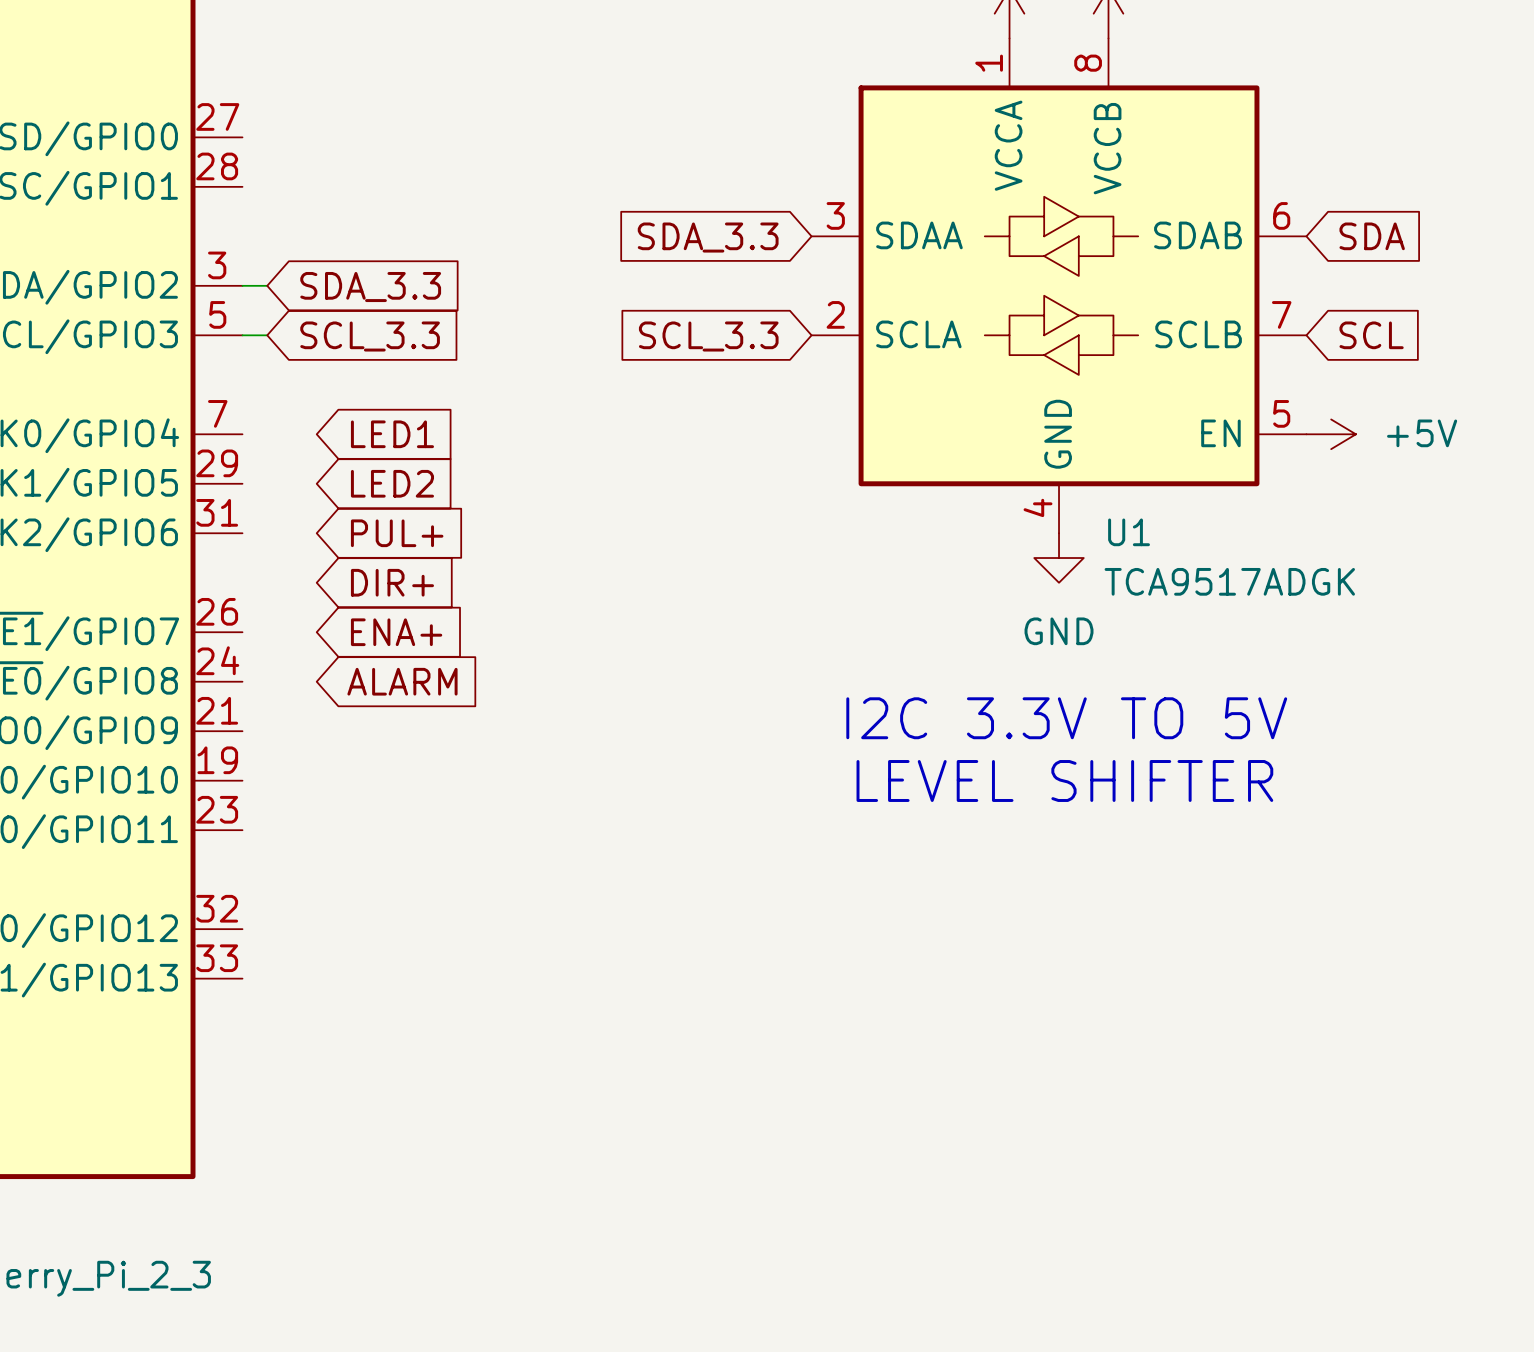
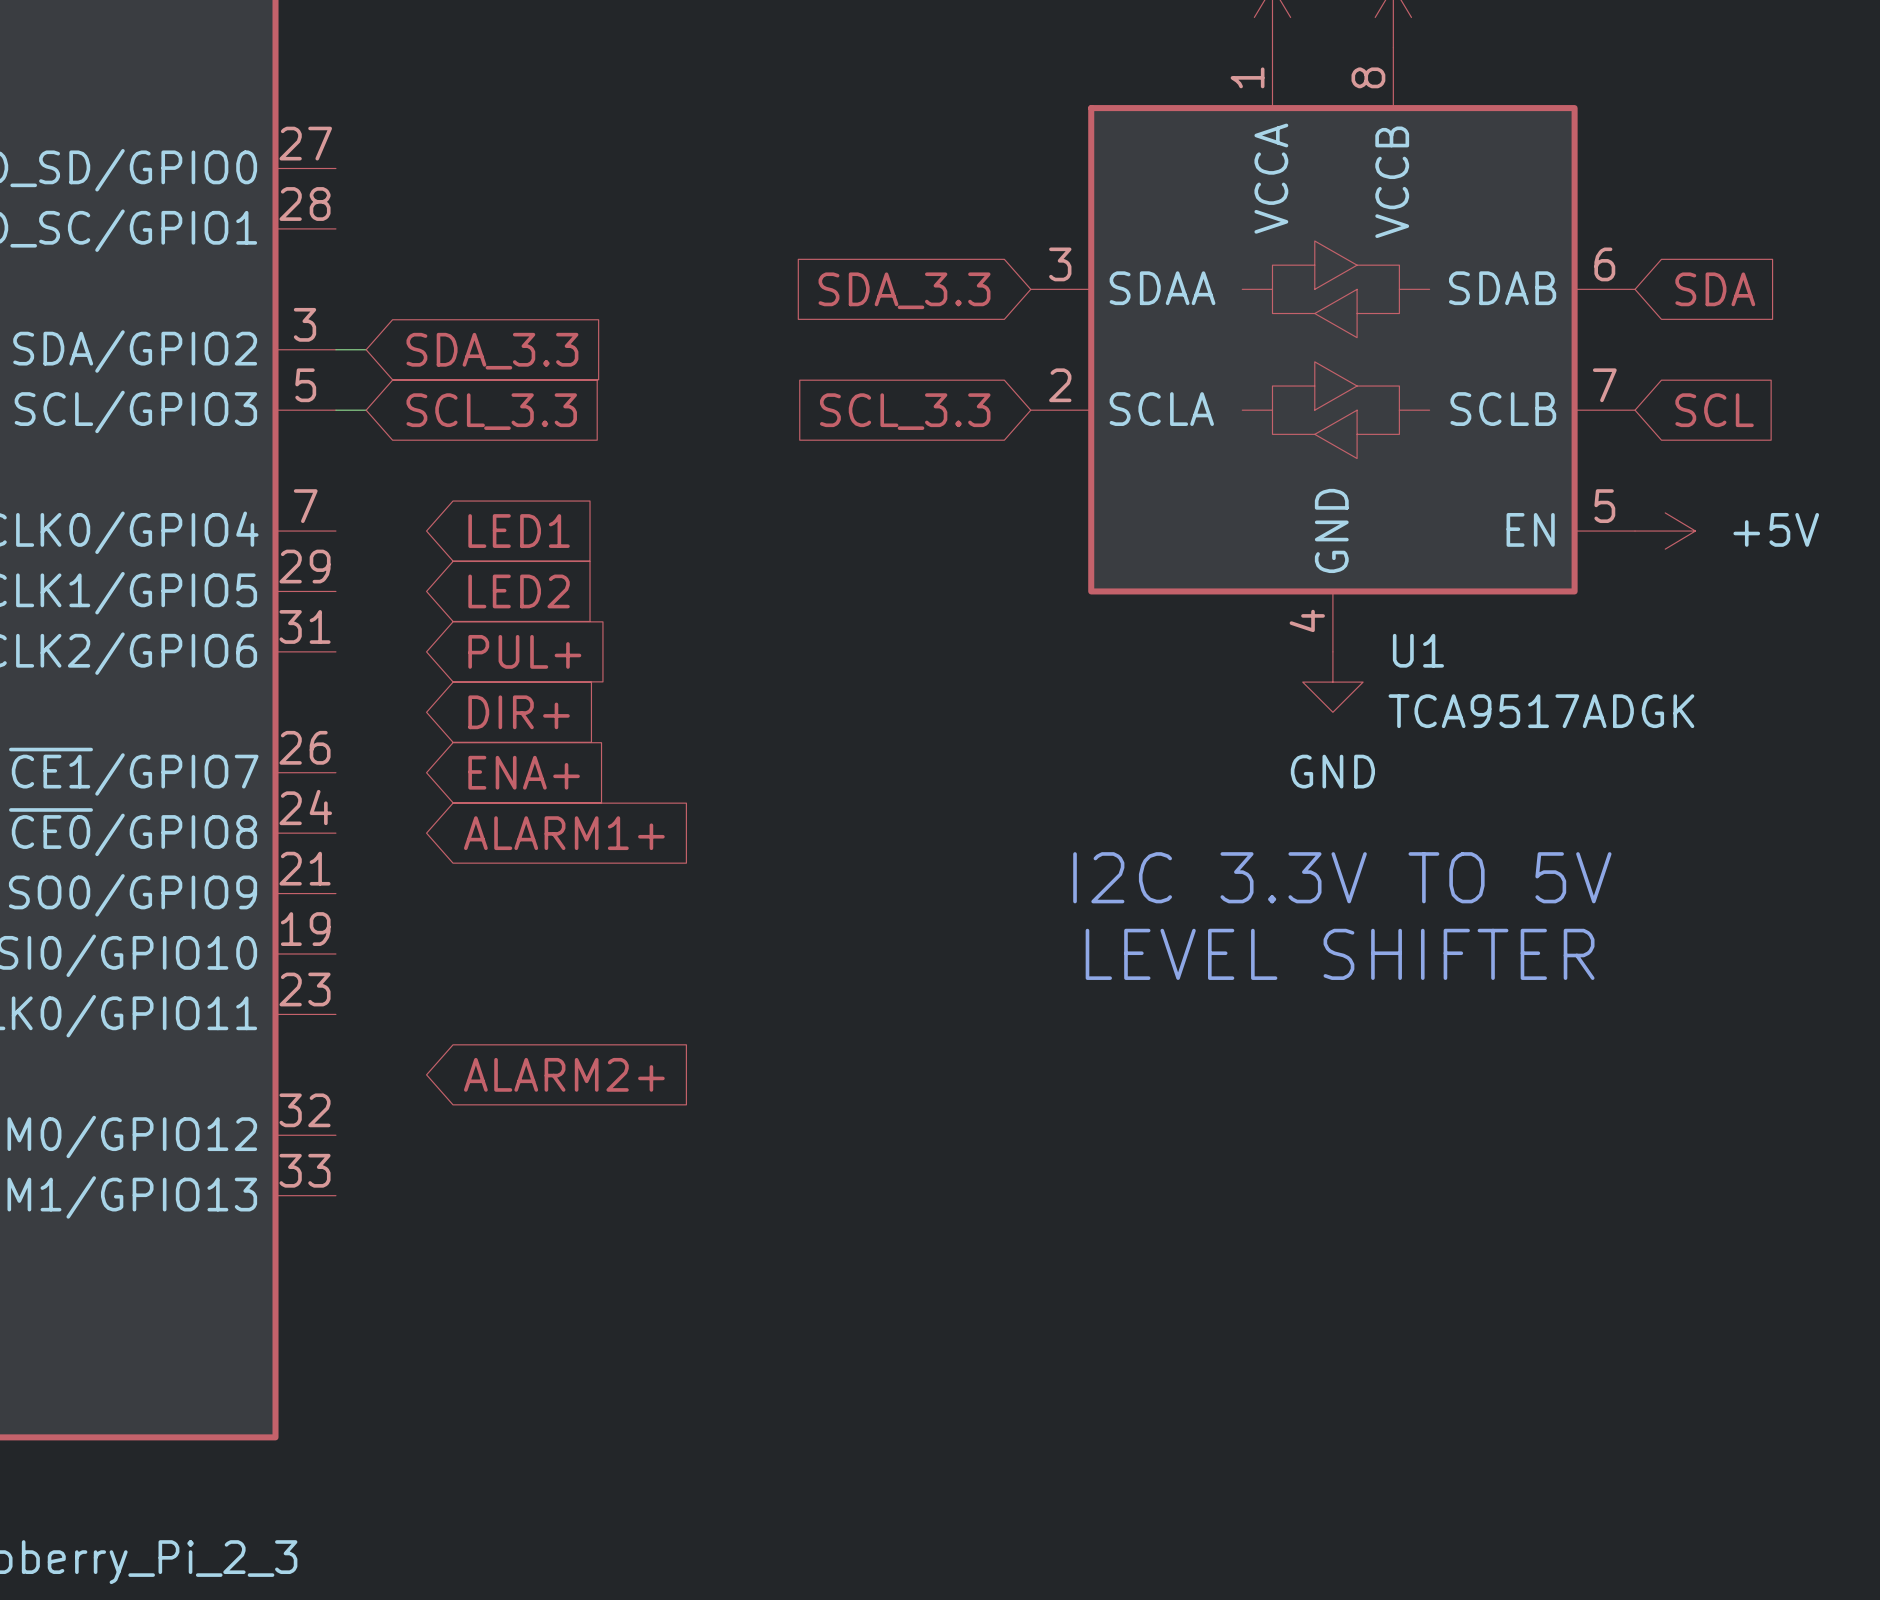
global label: ALARM (402, 681) -> ALARM1+ (564, 833)
global label: none -> ALARM2+ (564, 1074)

